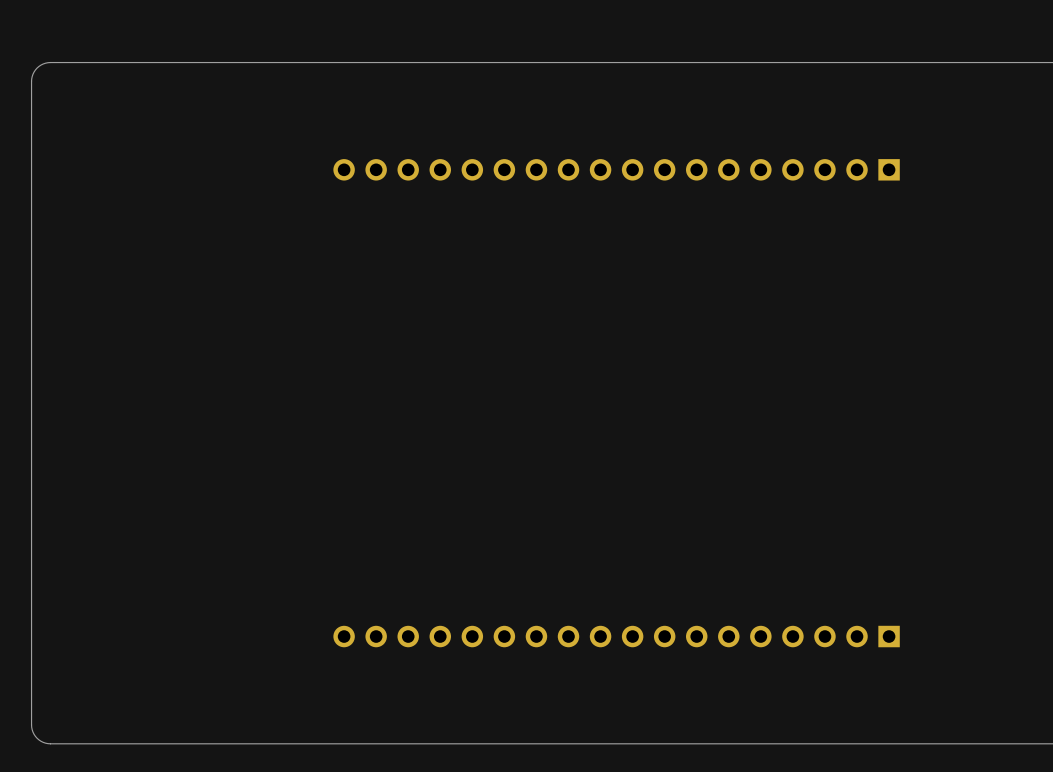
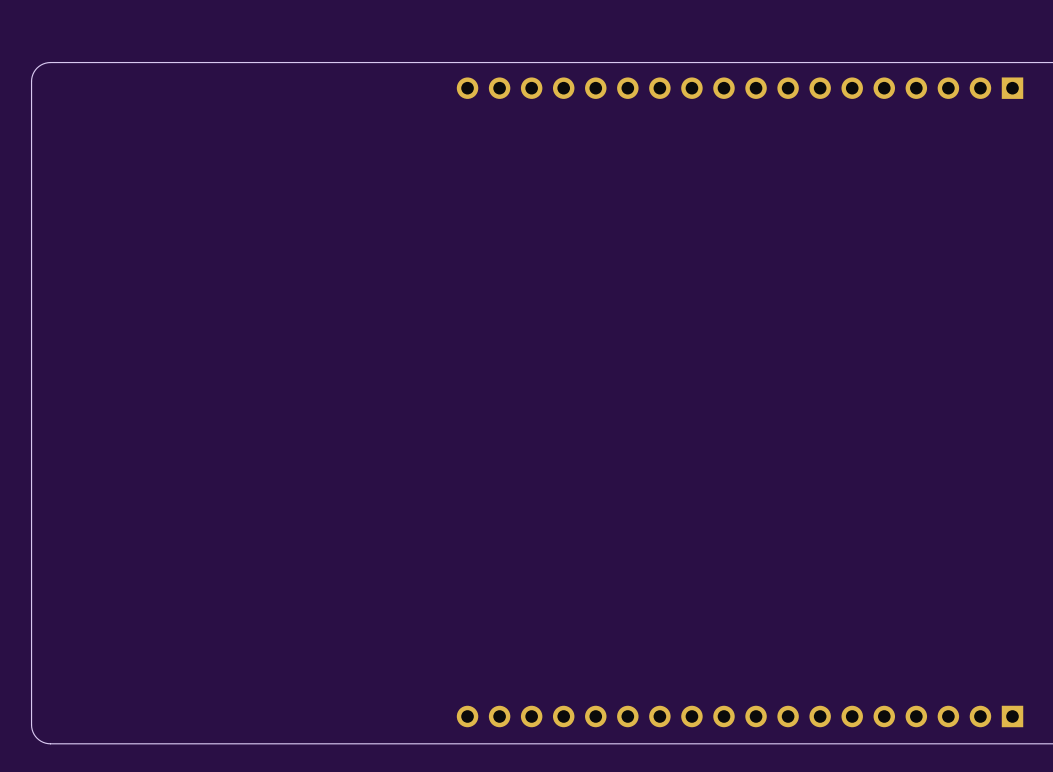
part position: (616, 169) -> (740, 88)
part position: (616, 636) -> (740, 716)

